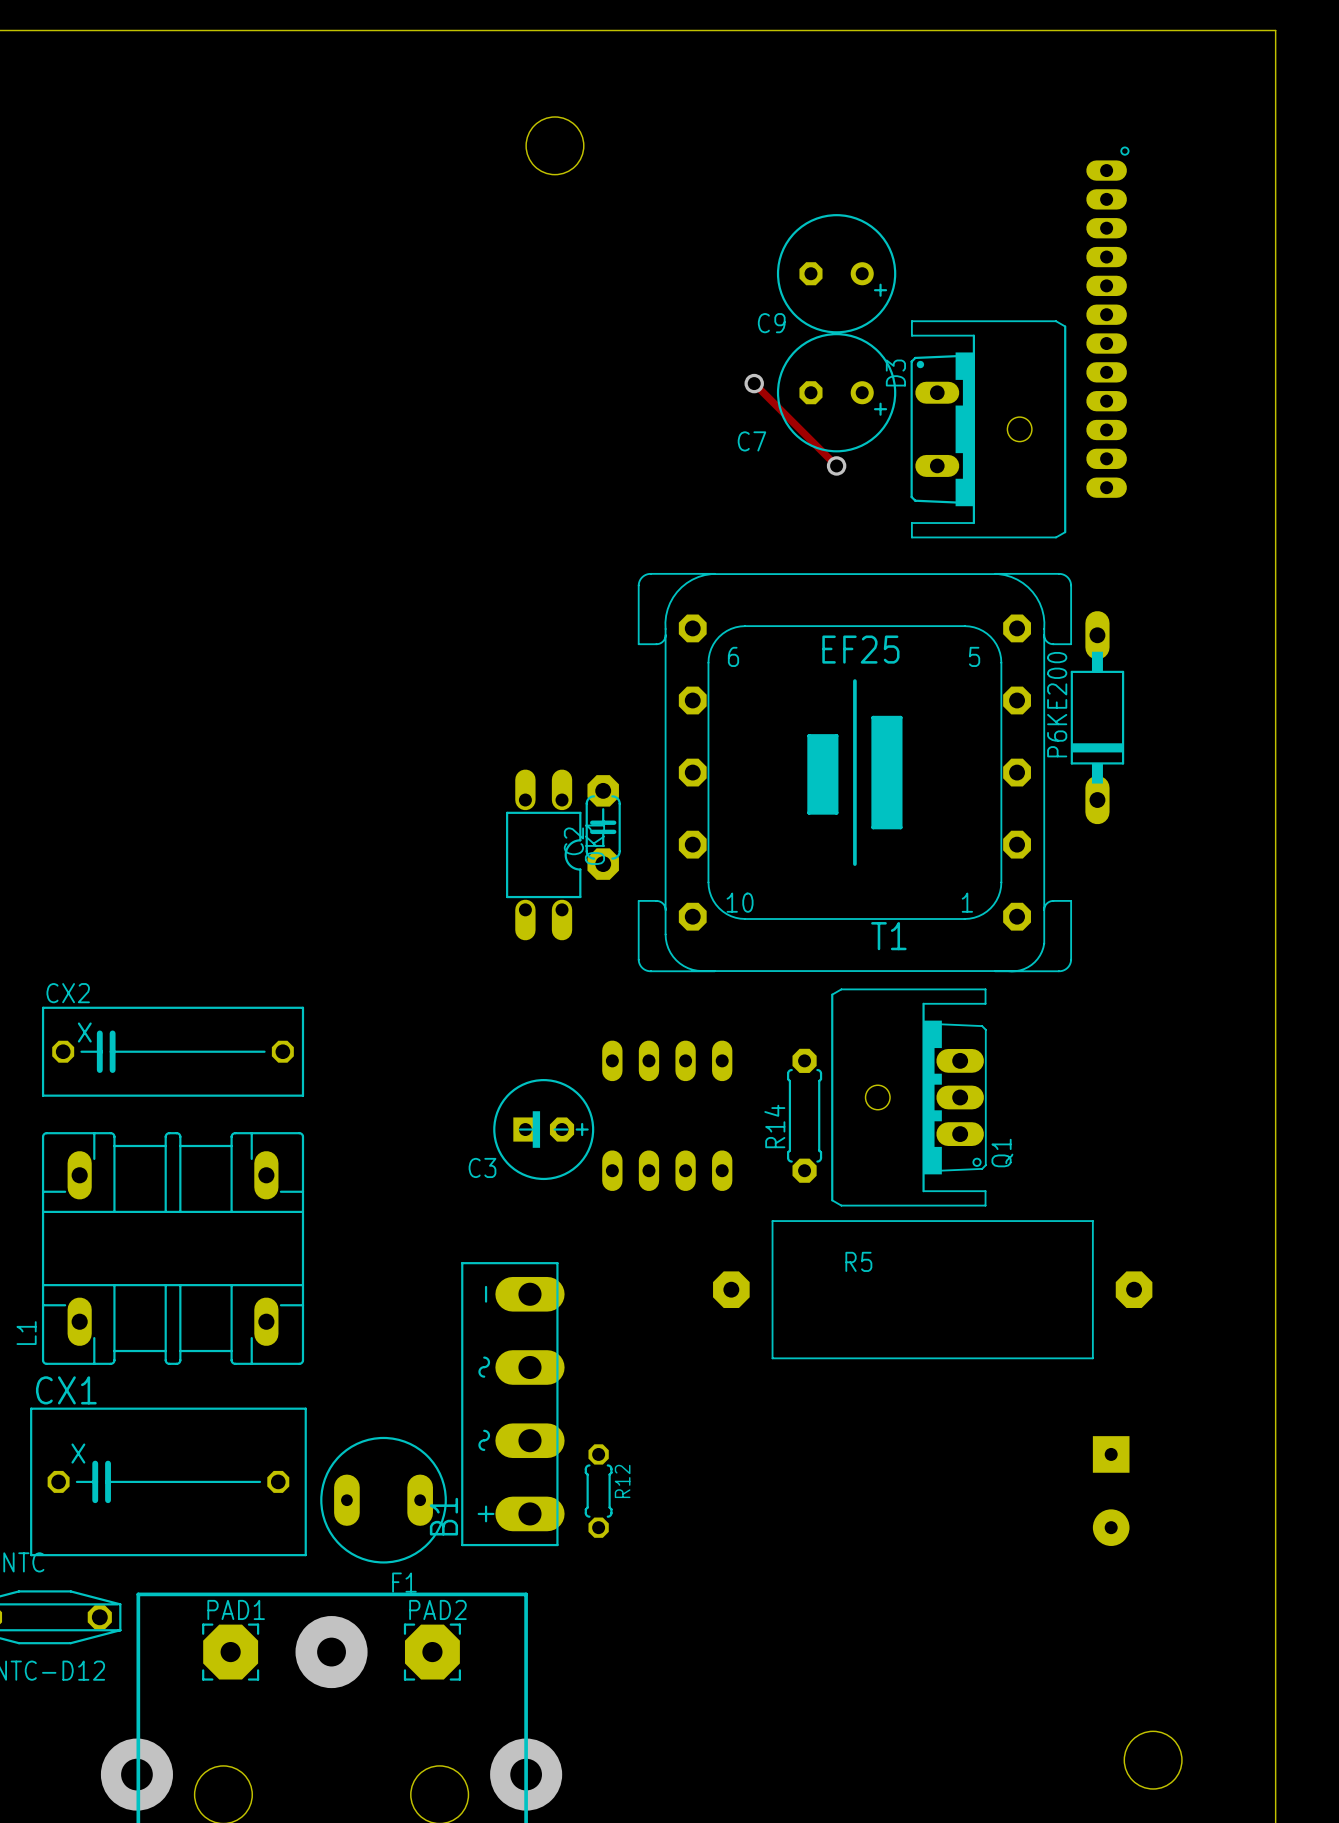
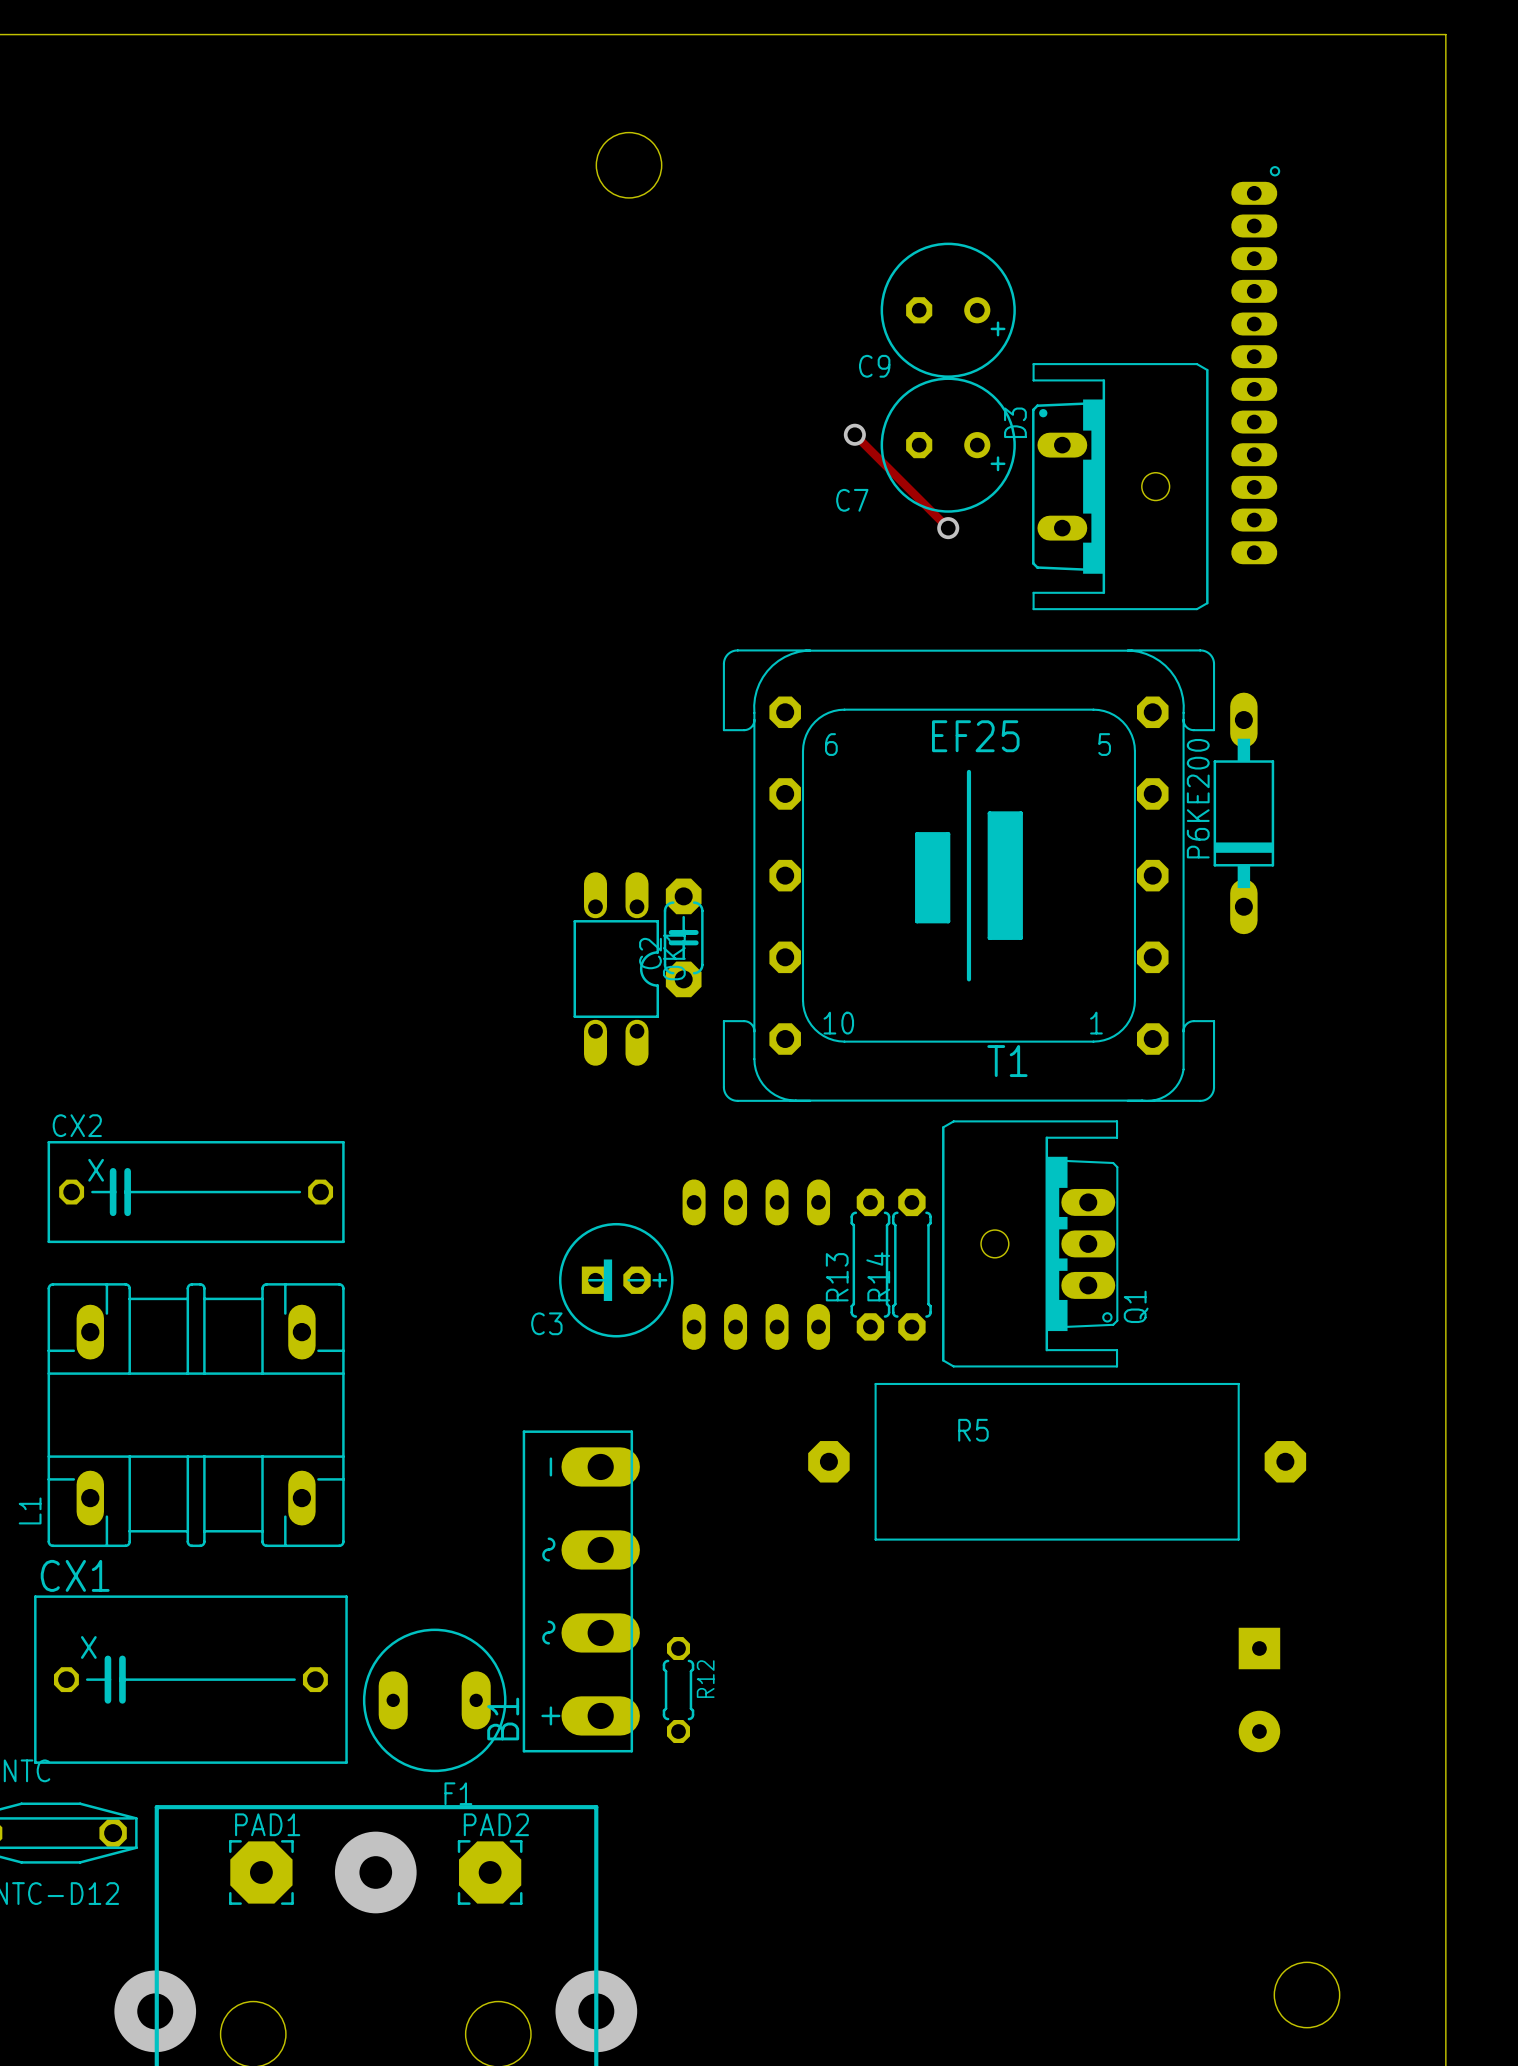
R13: none -> (870, 1264)

